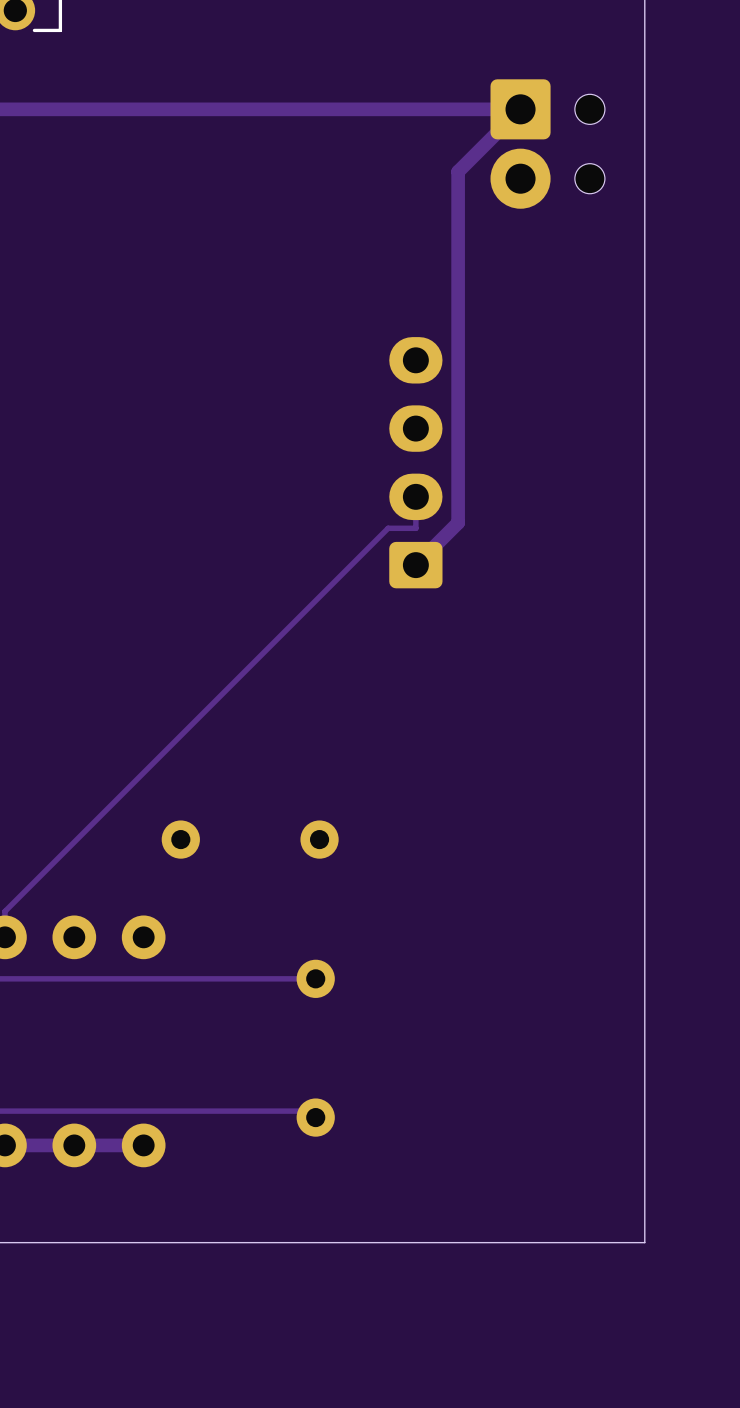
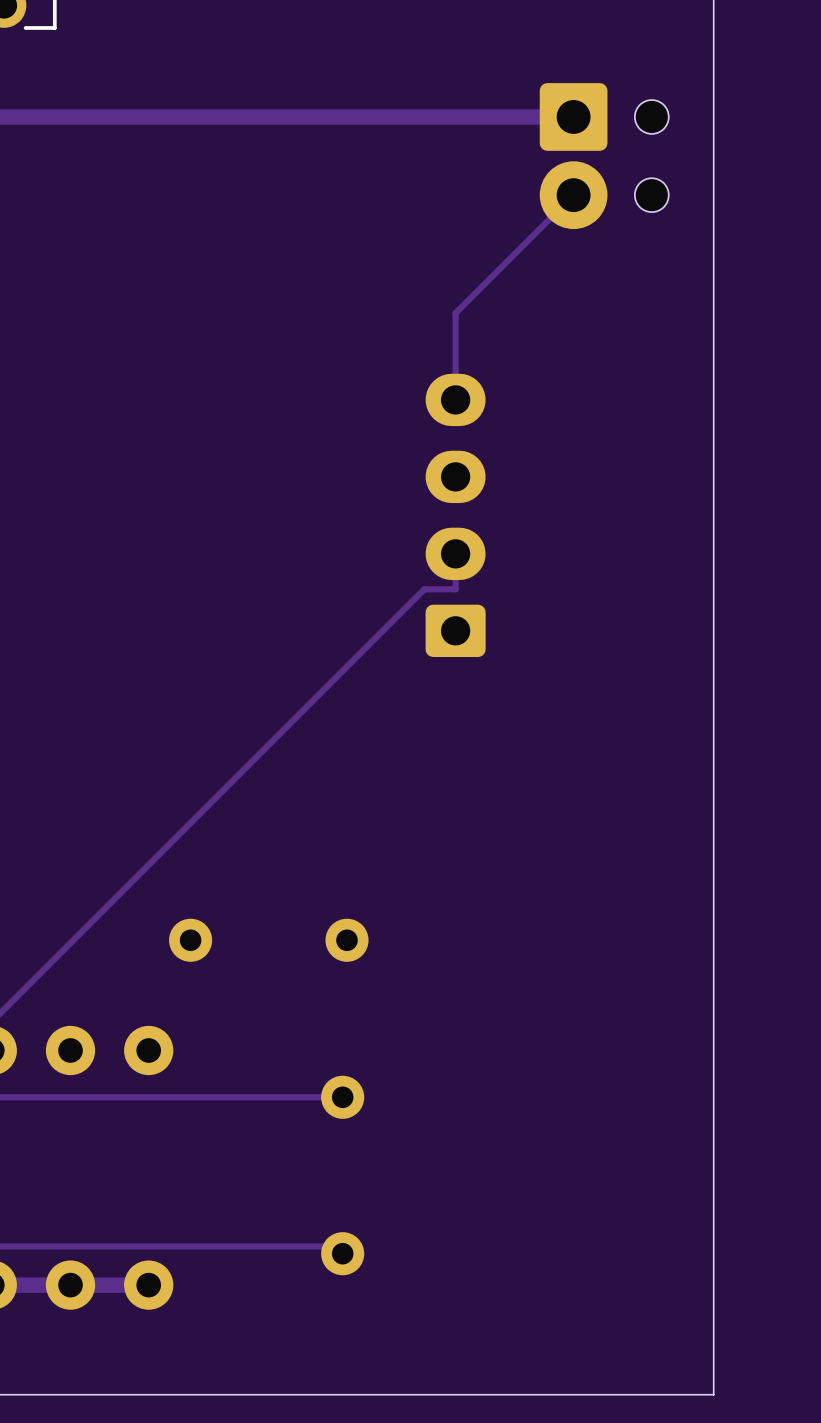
track: (520, 109) (458, 171) (458, 522) (415, 565) -> none
track: none -> (573, 195) (455, 313) (455, 399)

